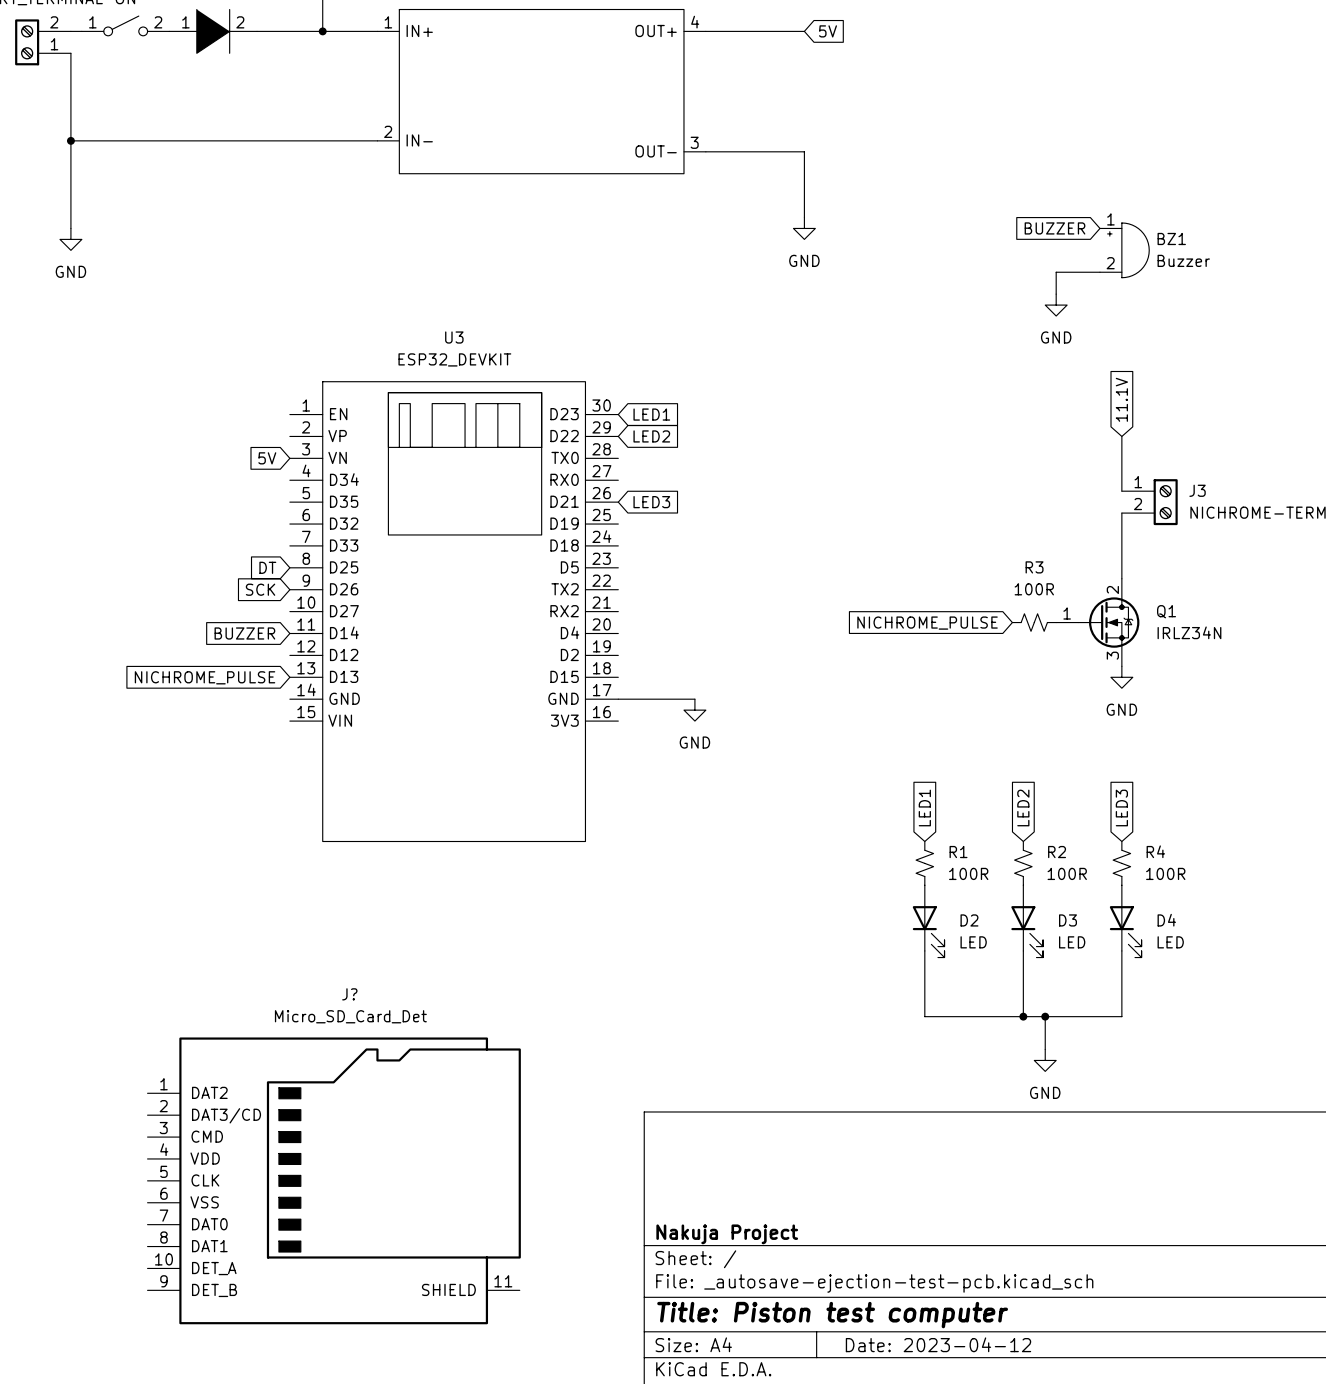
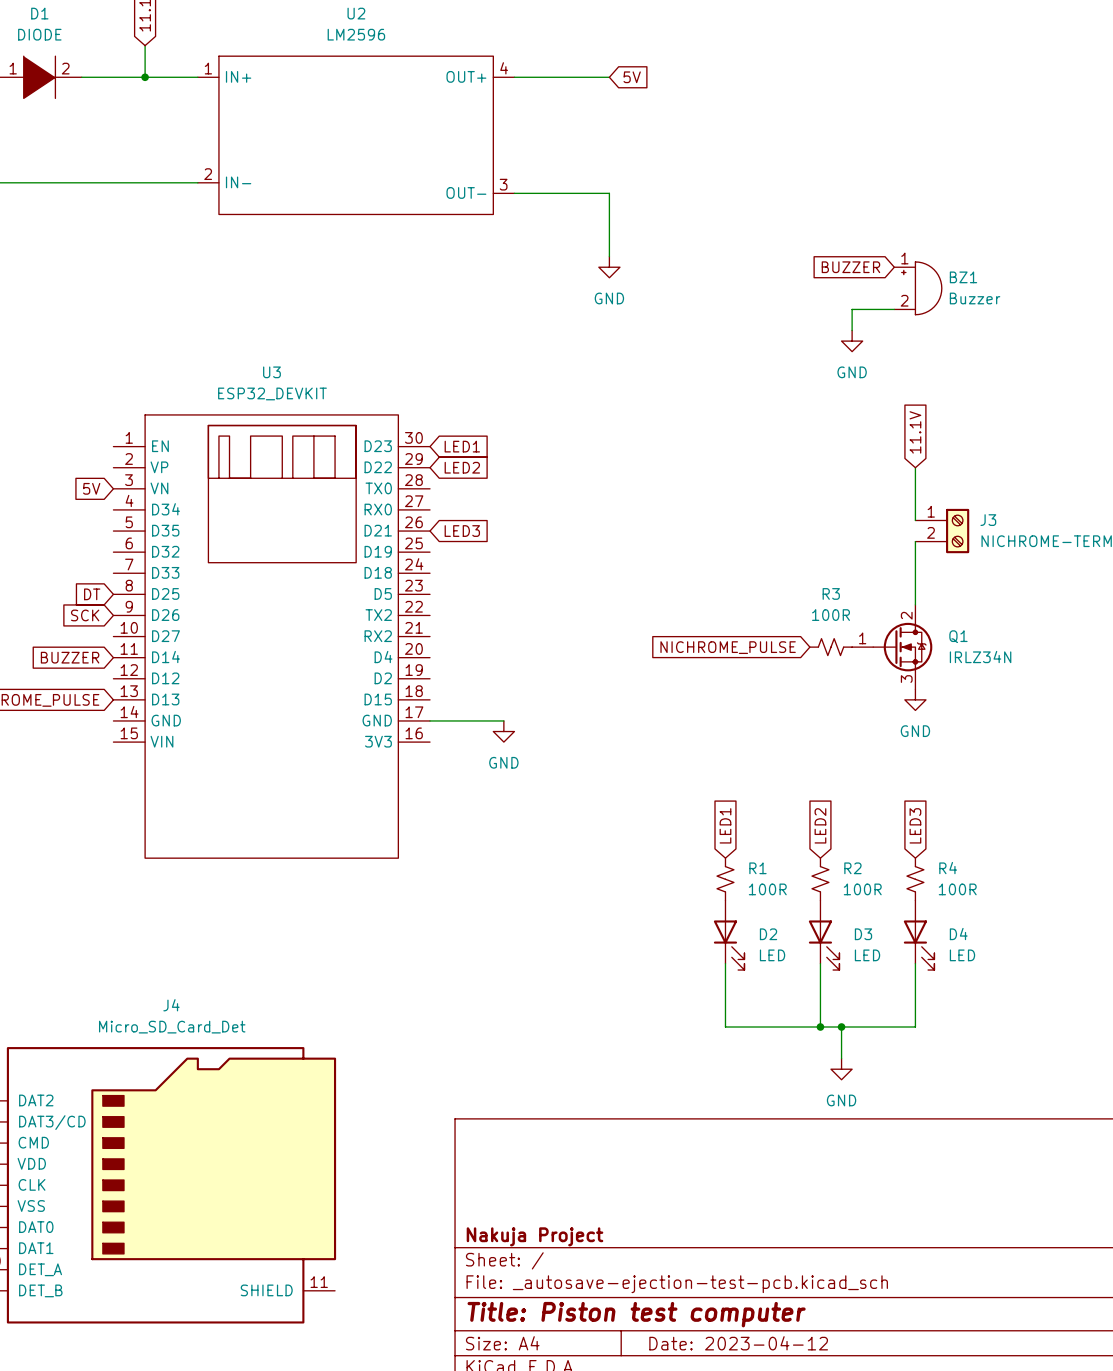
J? name: J? (349, 994) -> J4 (171, 1005)

